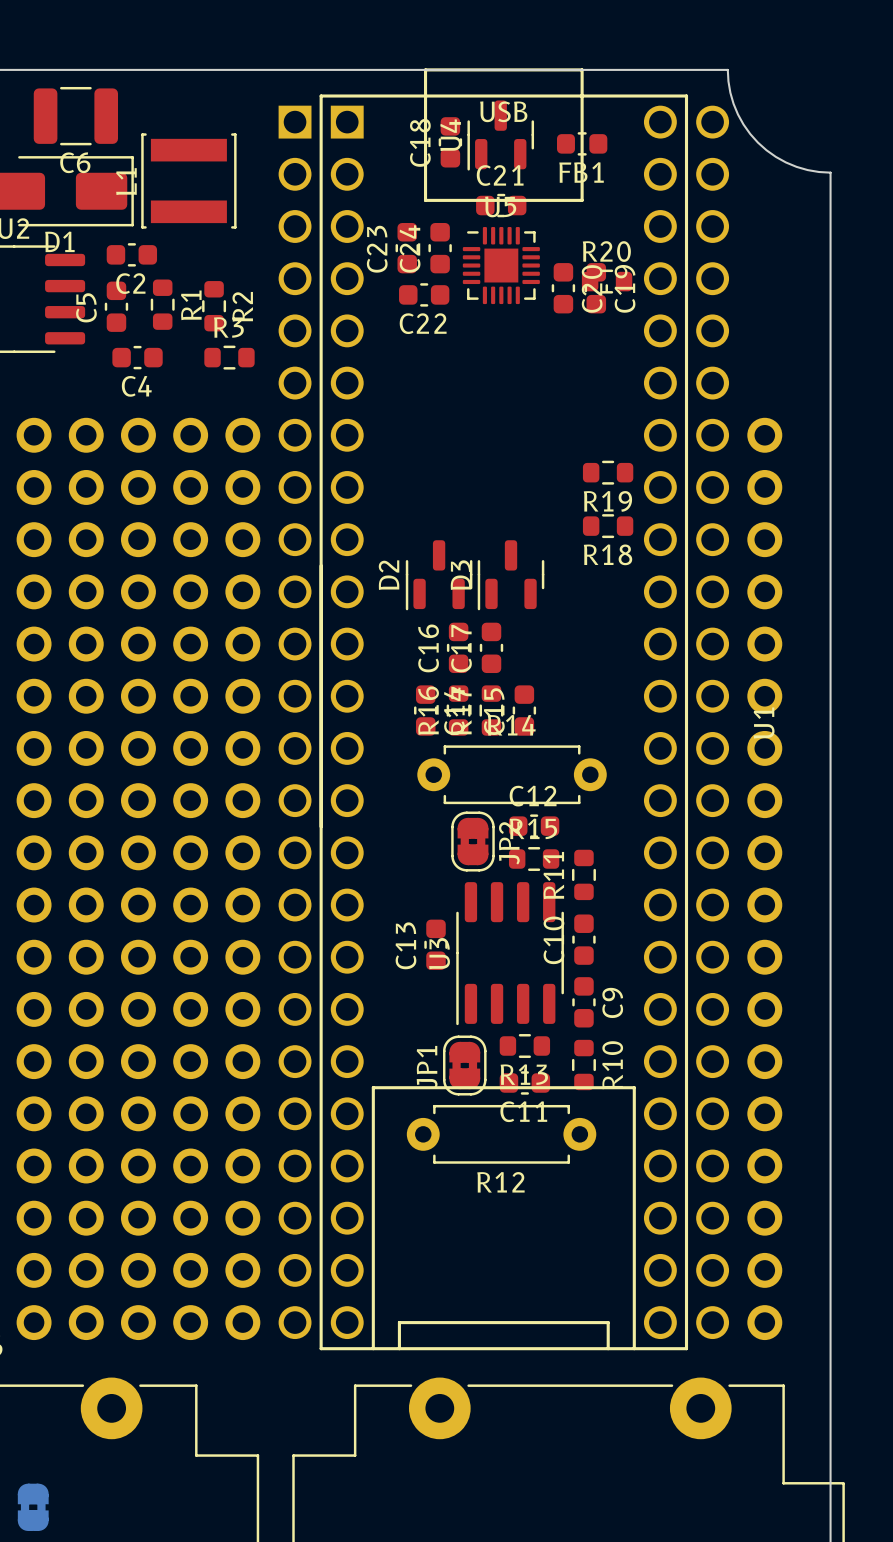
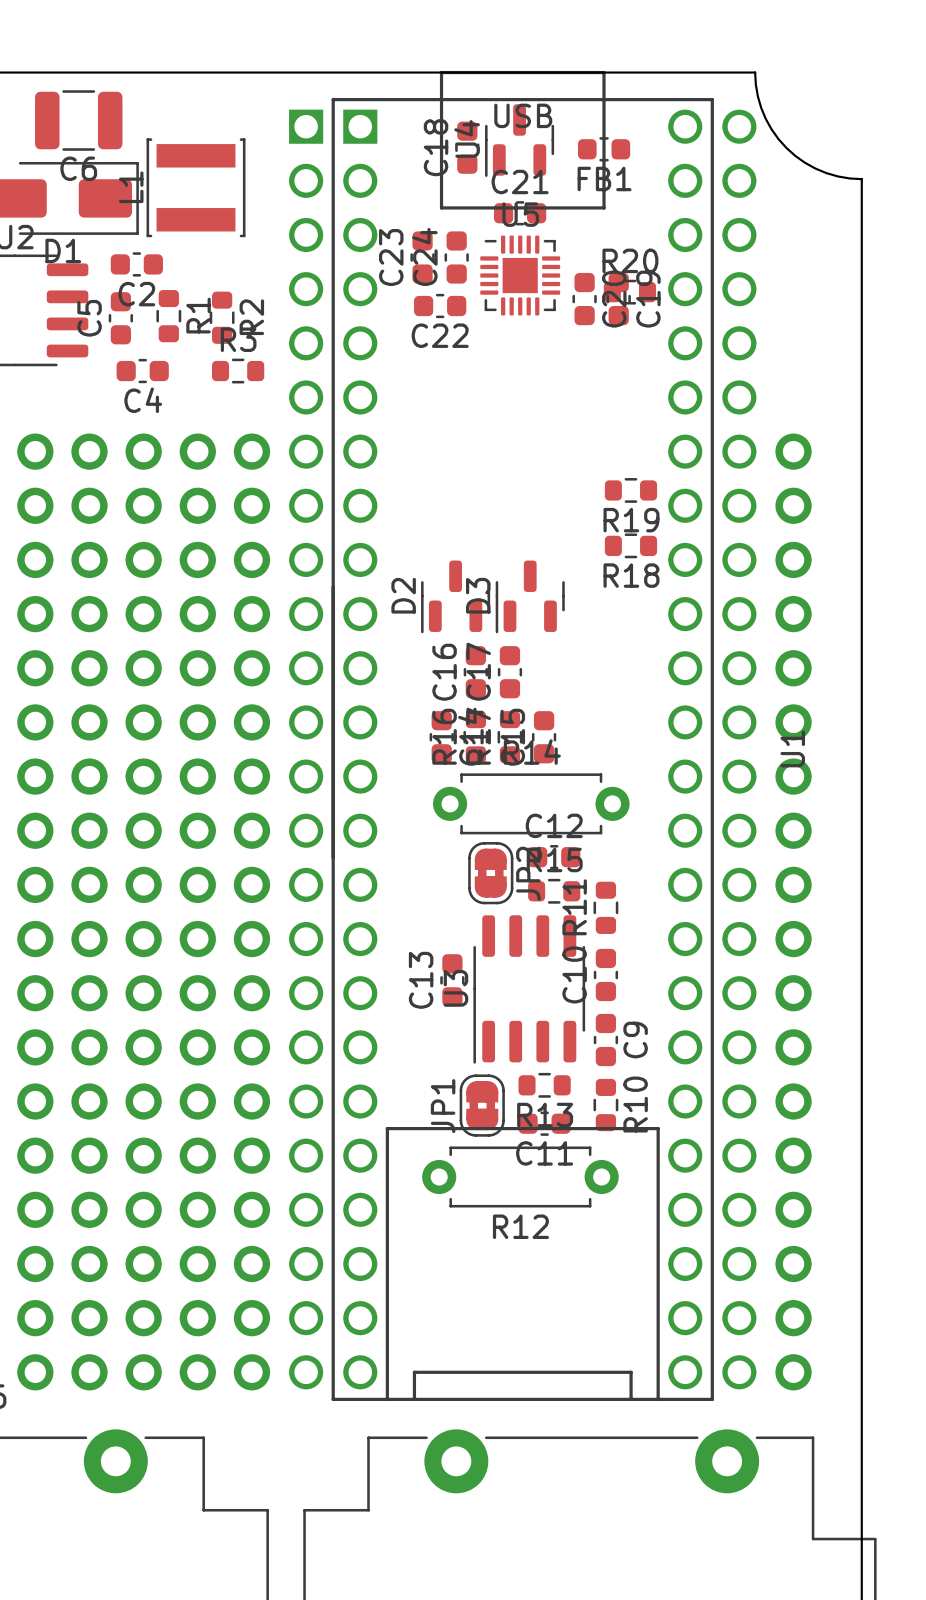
part: (33, 1507) -> none

